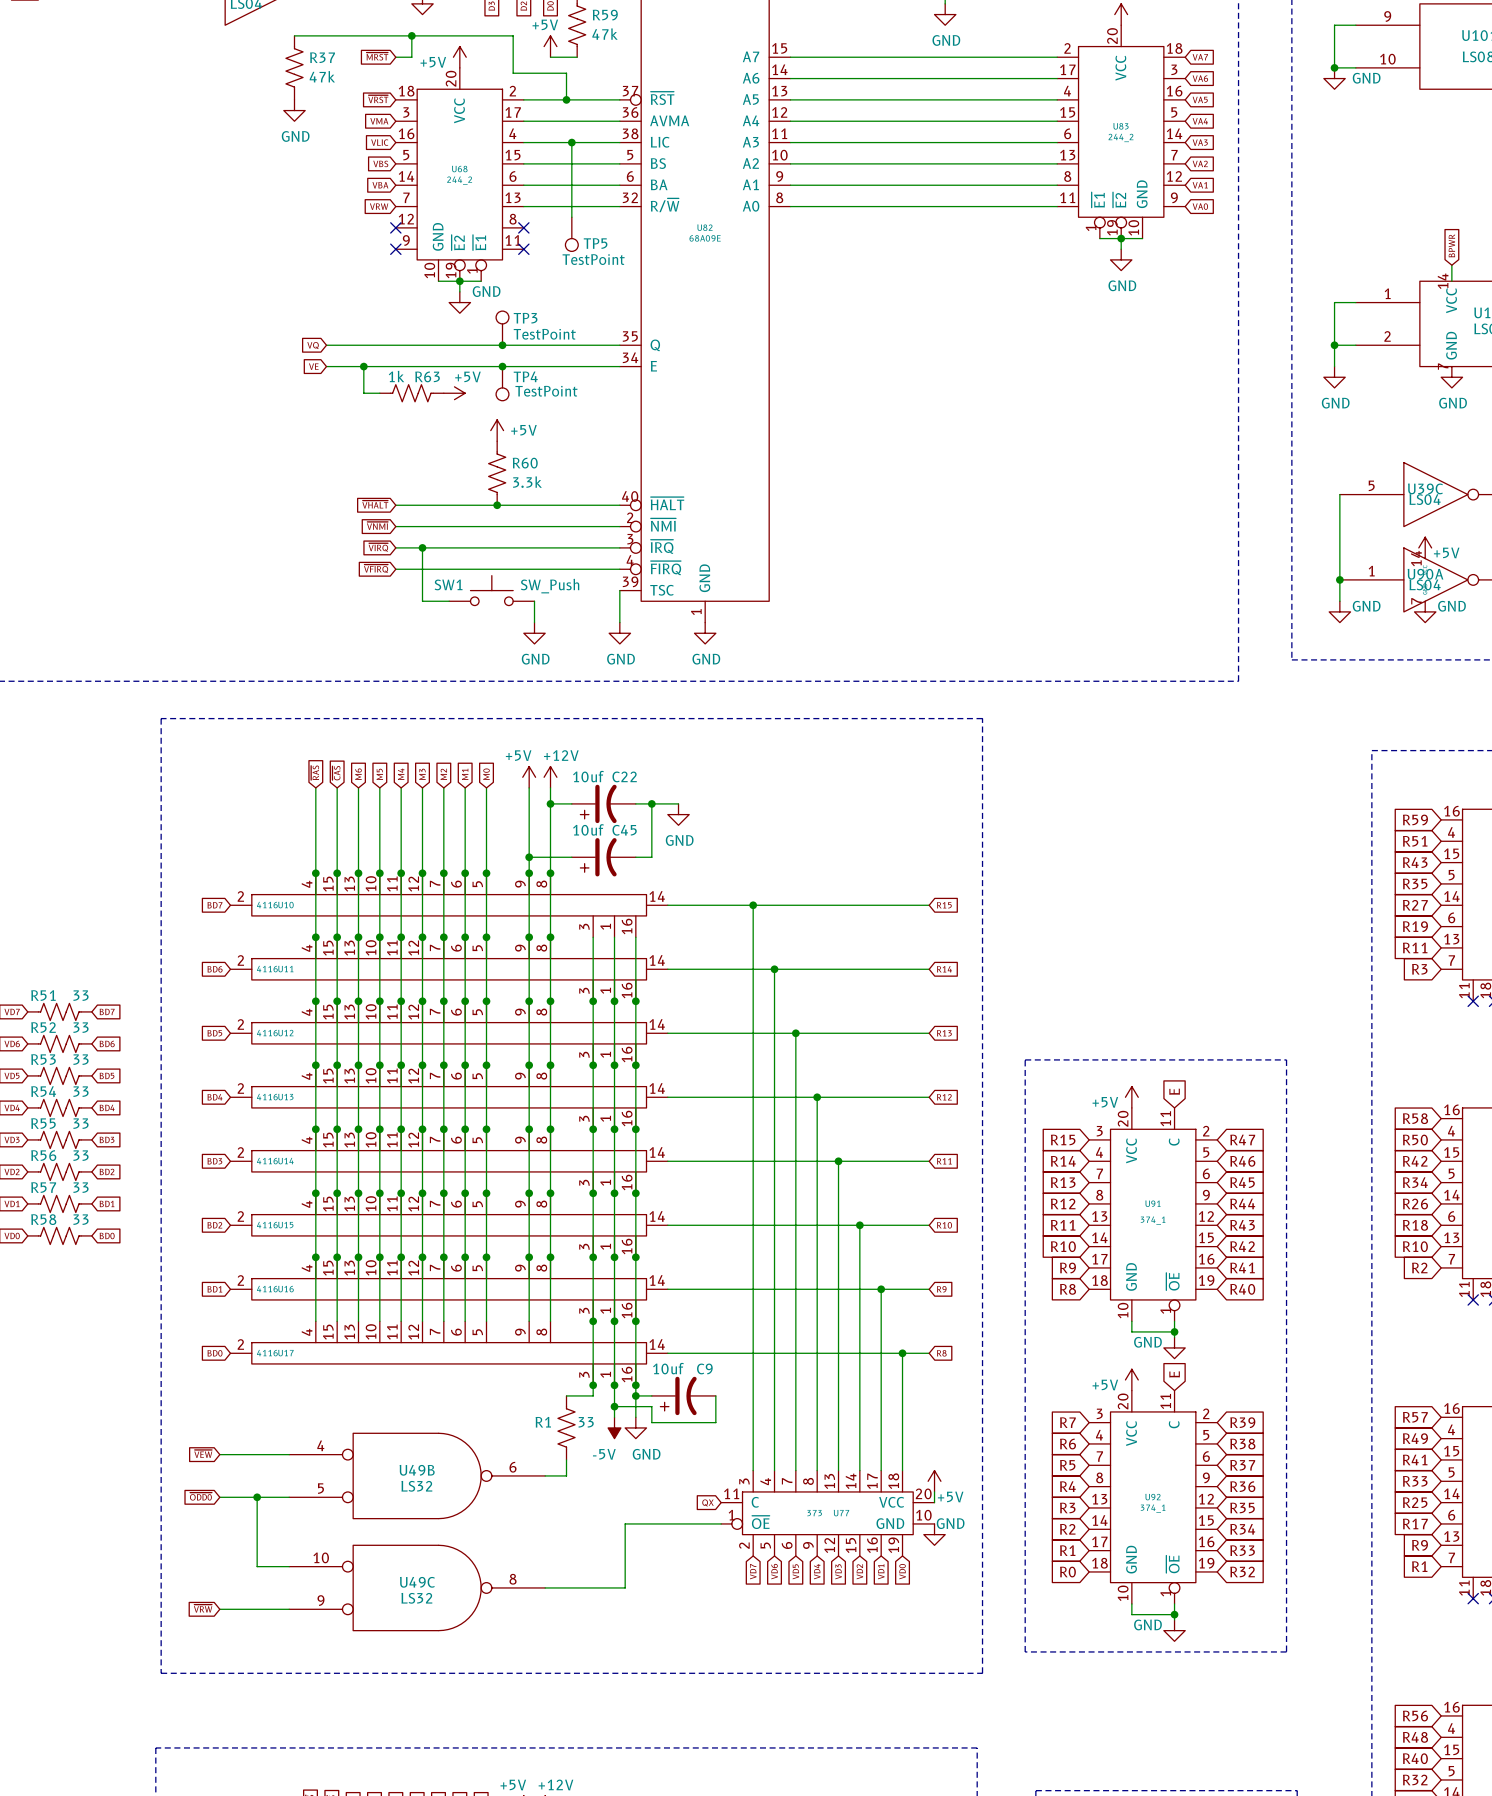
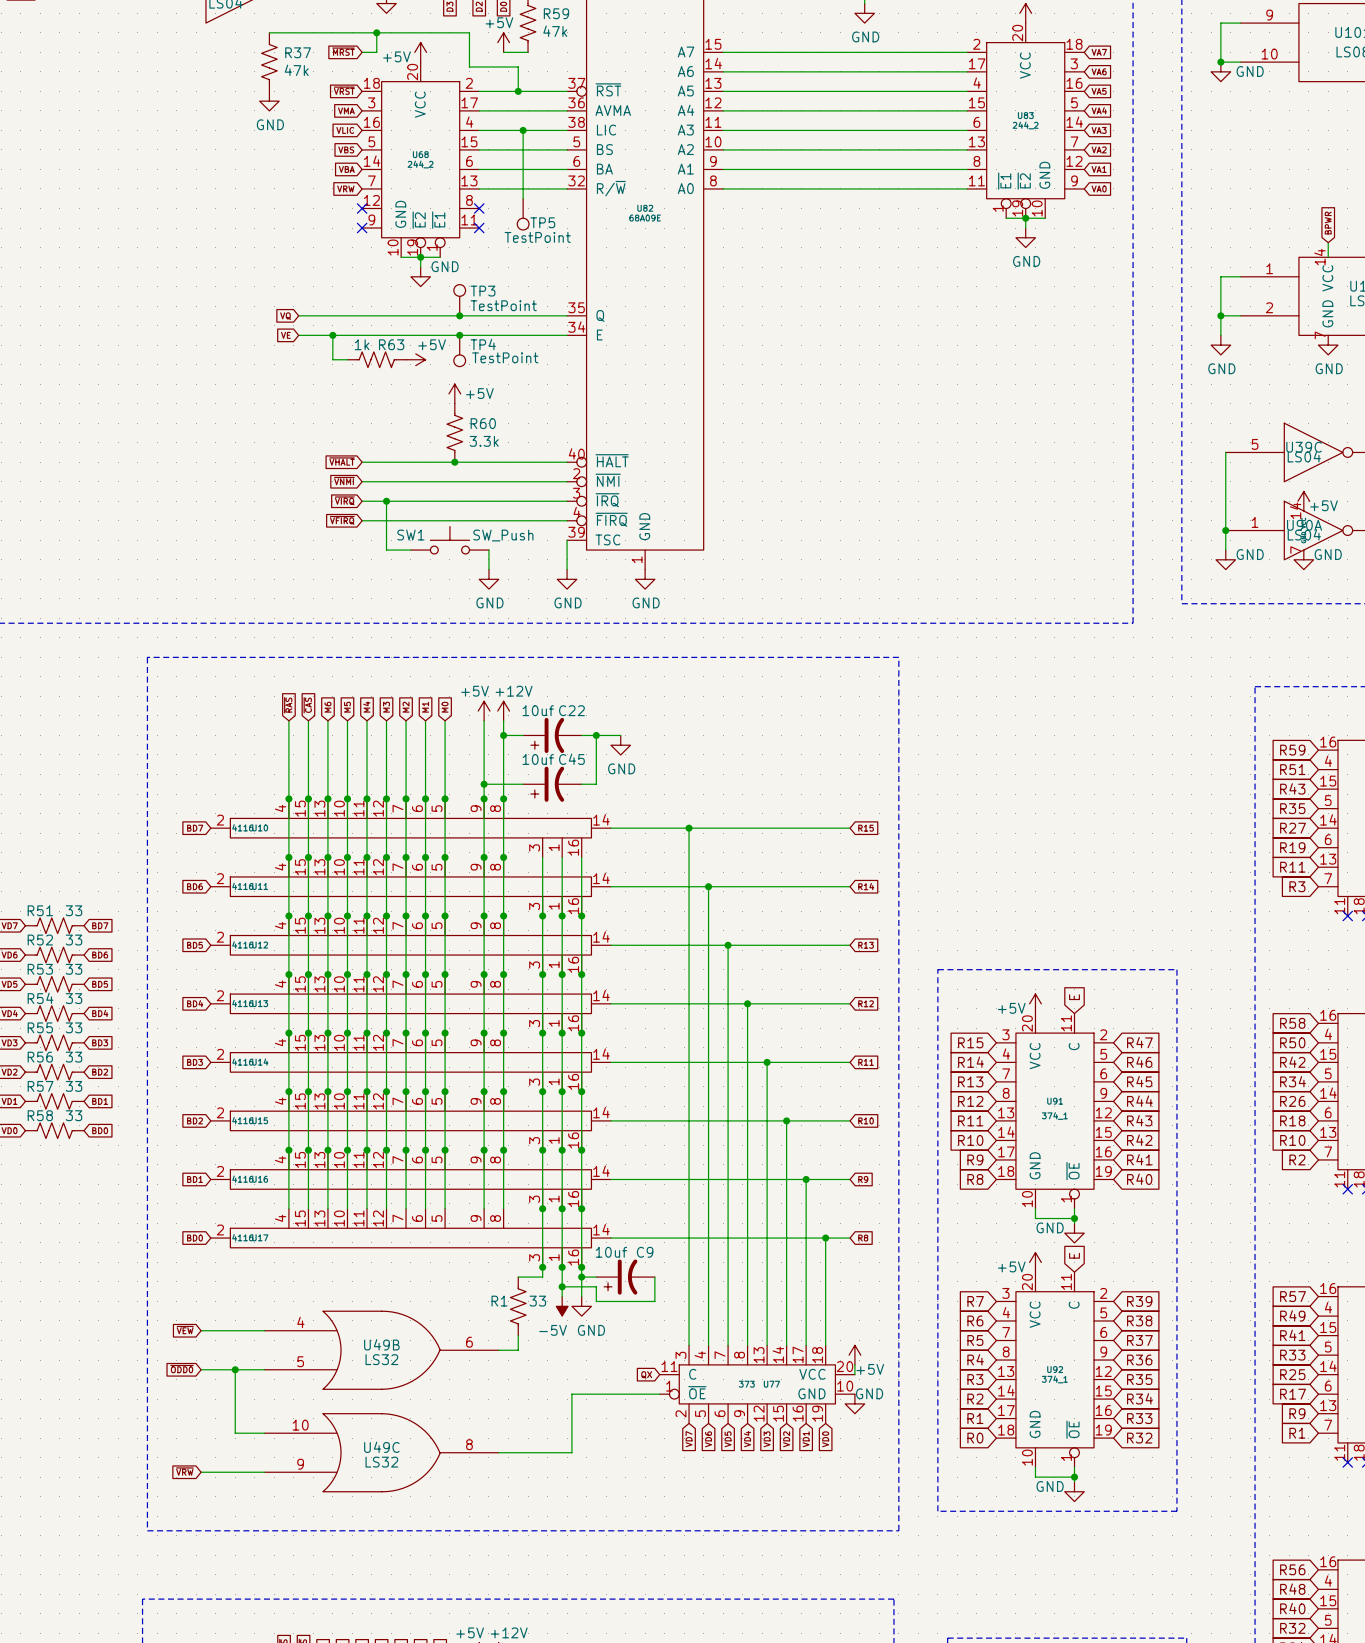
U49B symbol: [289, 1433, 546, 1519] -> [264, 1311, 499, 1390]
U49C symbol: [289, 1545, 546, 1631] -> [264, 1413, 499, 1492]

